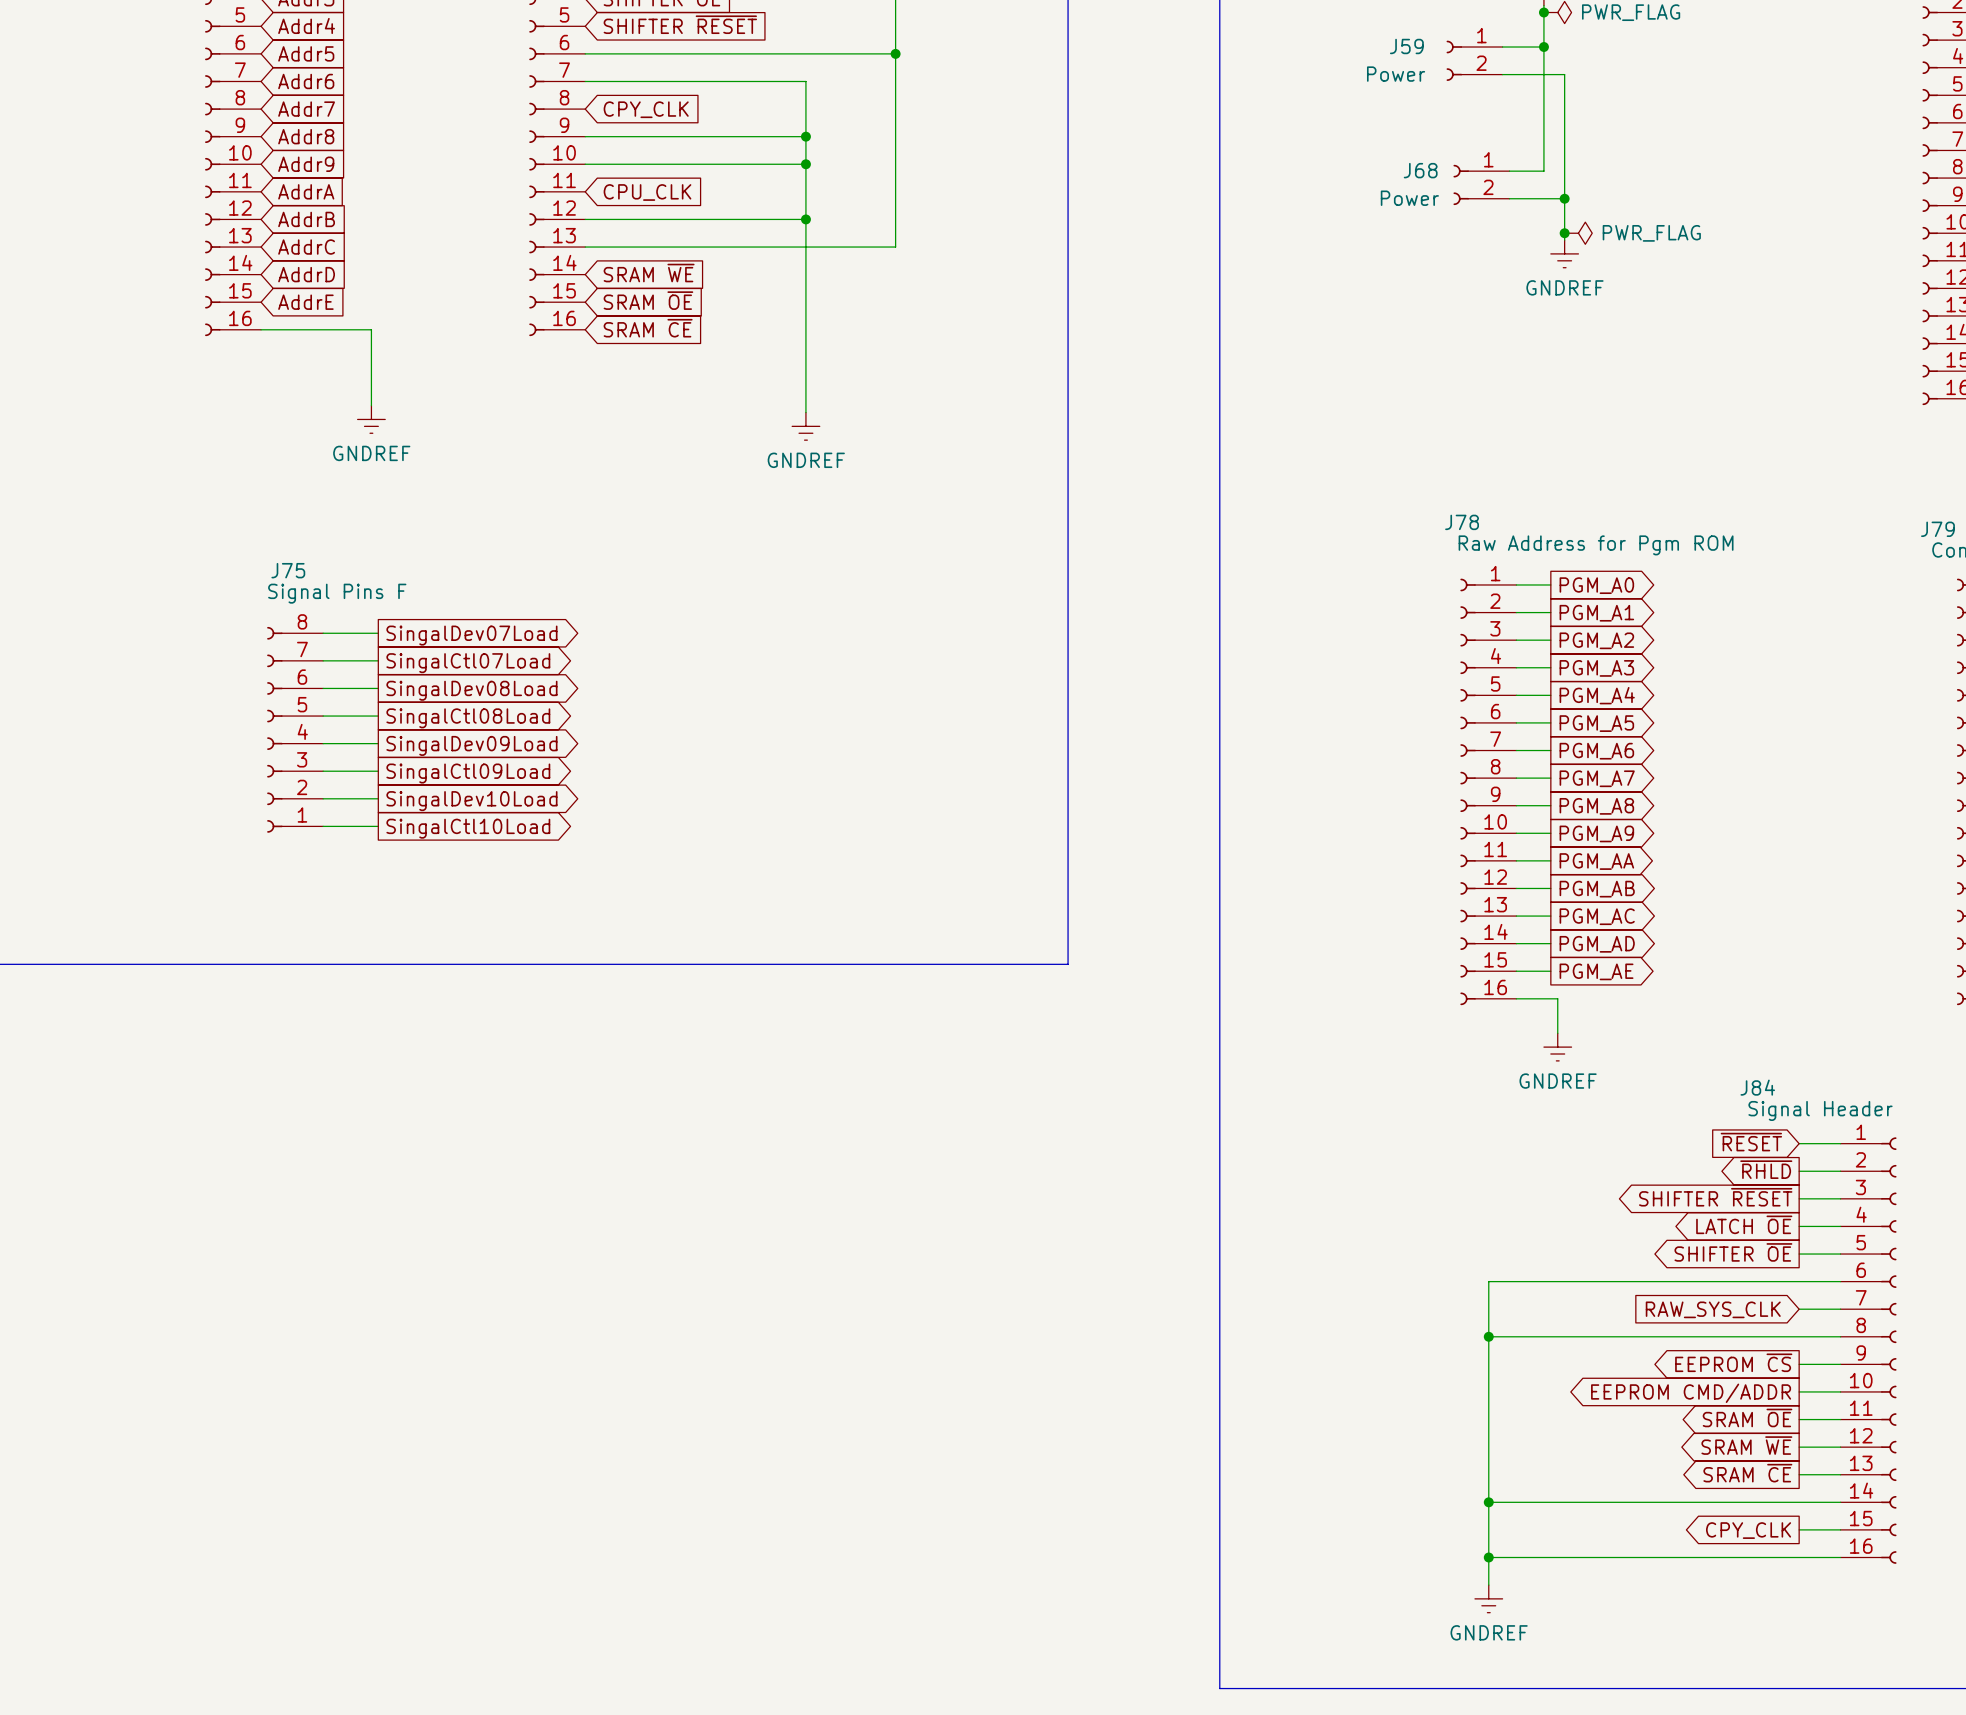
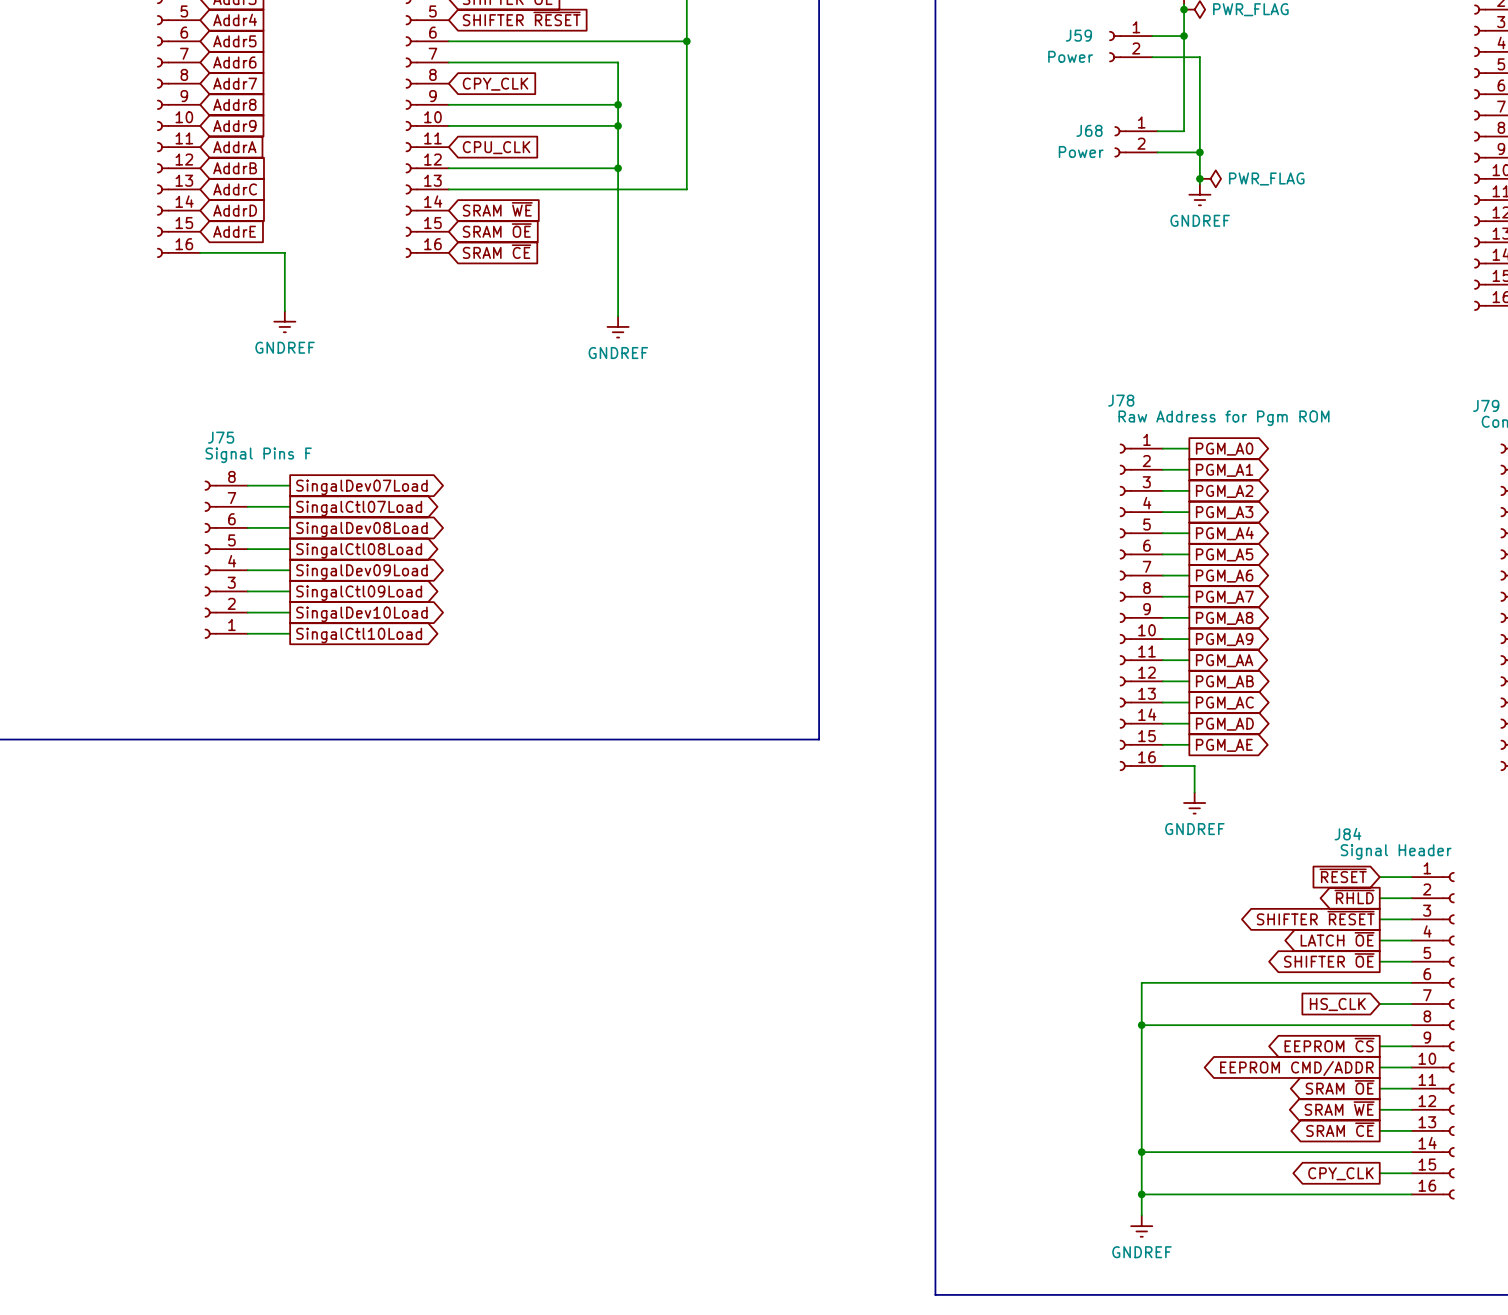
global label: RAW_SYS_CLK (1713, 1309) -> HS_CLK (1337, 1004)

